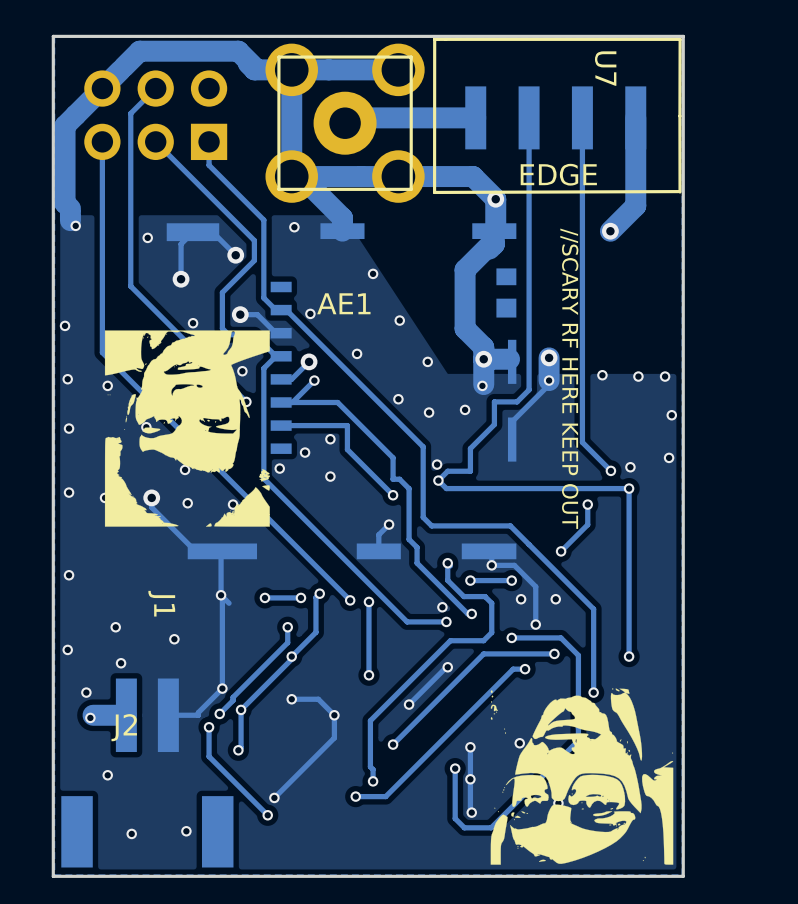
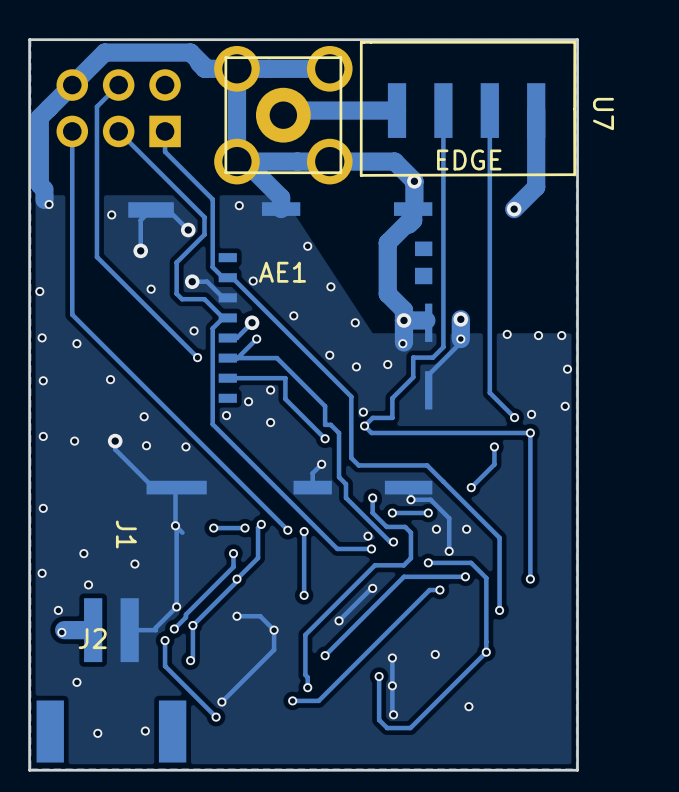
U7 name position: U7 (605, 68) -> U7 (603, 114)
drawing: [104, 330, 270, 527] -> none
text: //SCARY RF HERE KEEP OUT (569, 378) -> none
drawing: [490, 688, 674, 865] -> none

